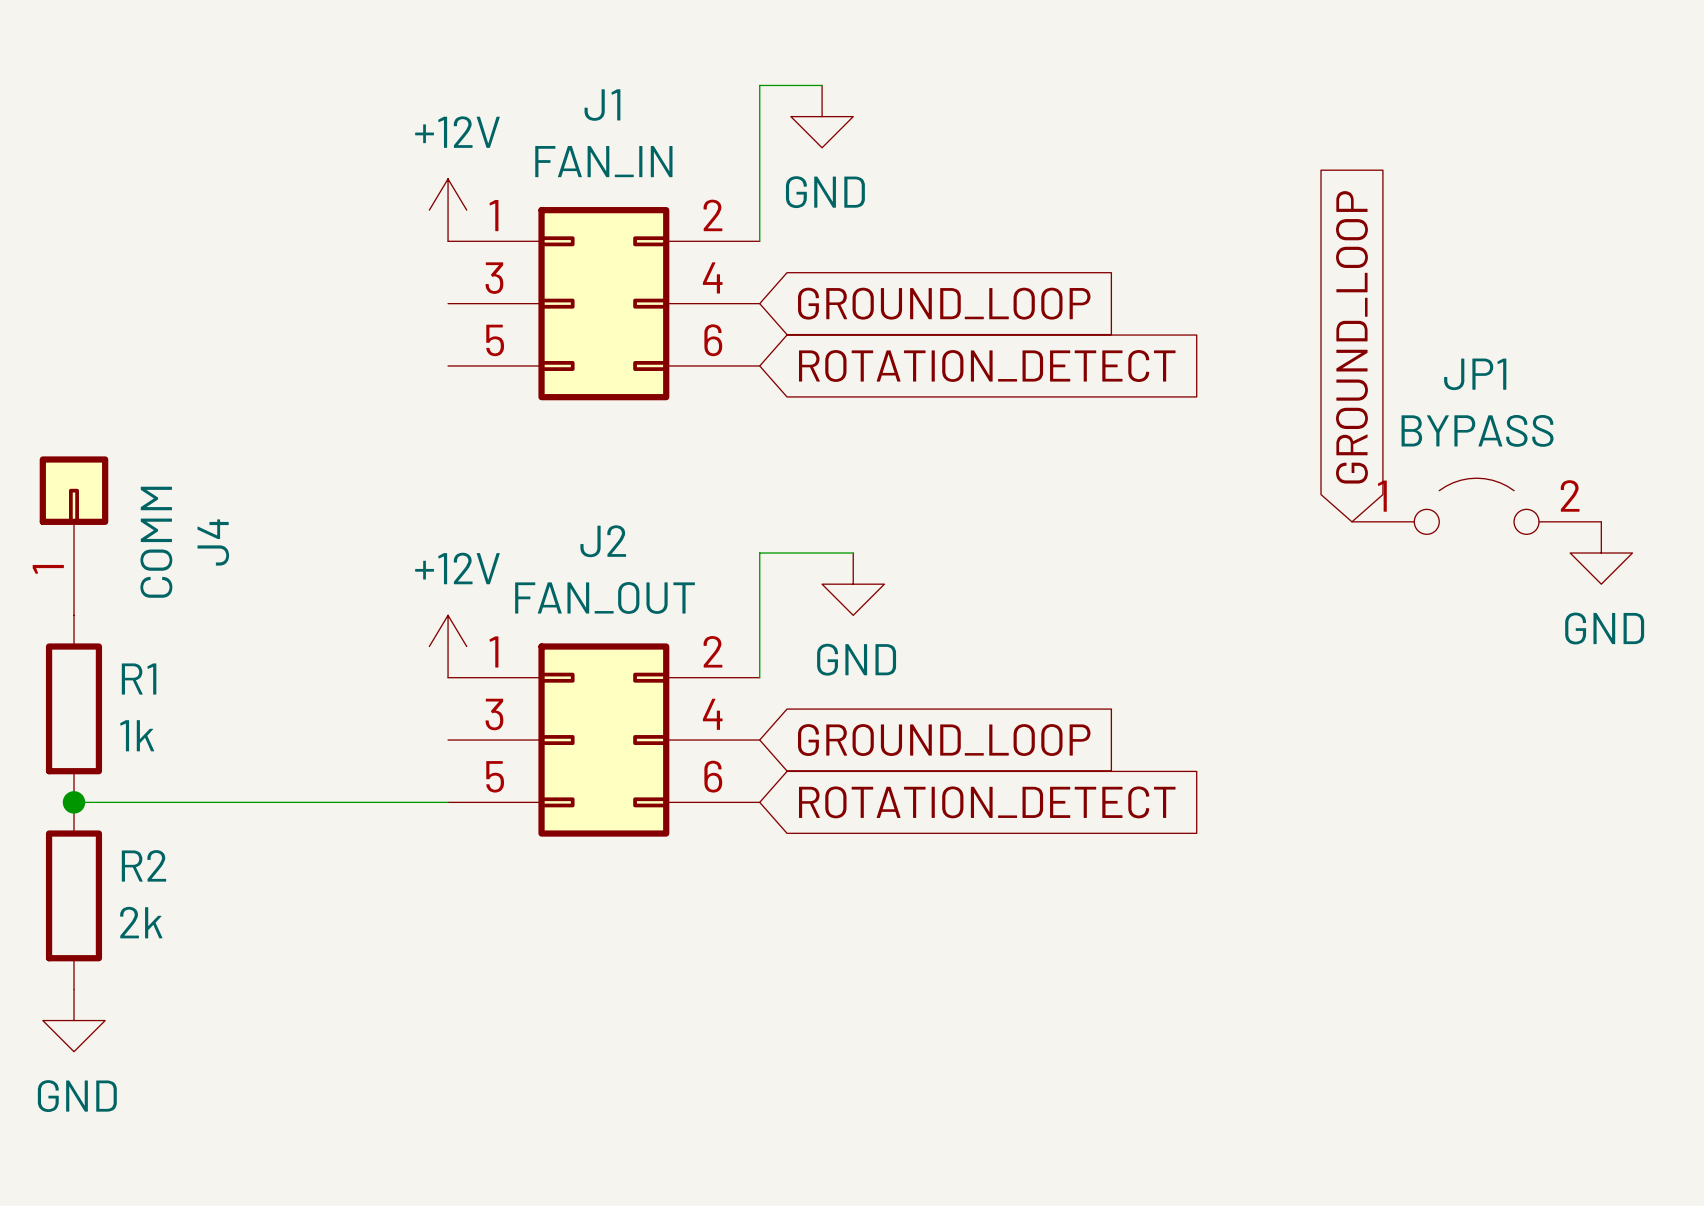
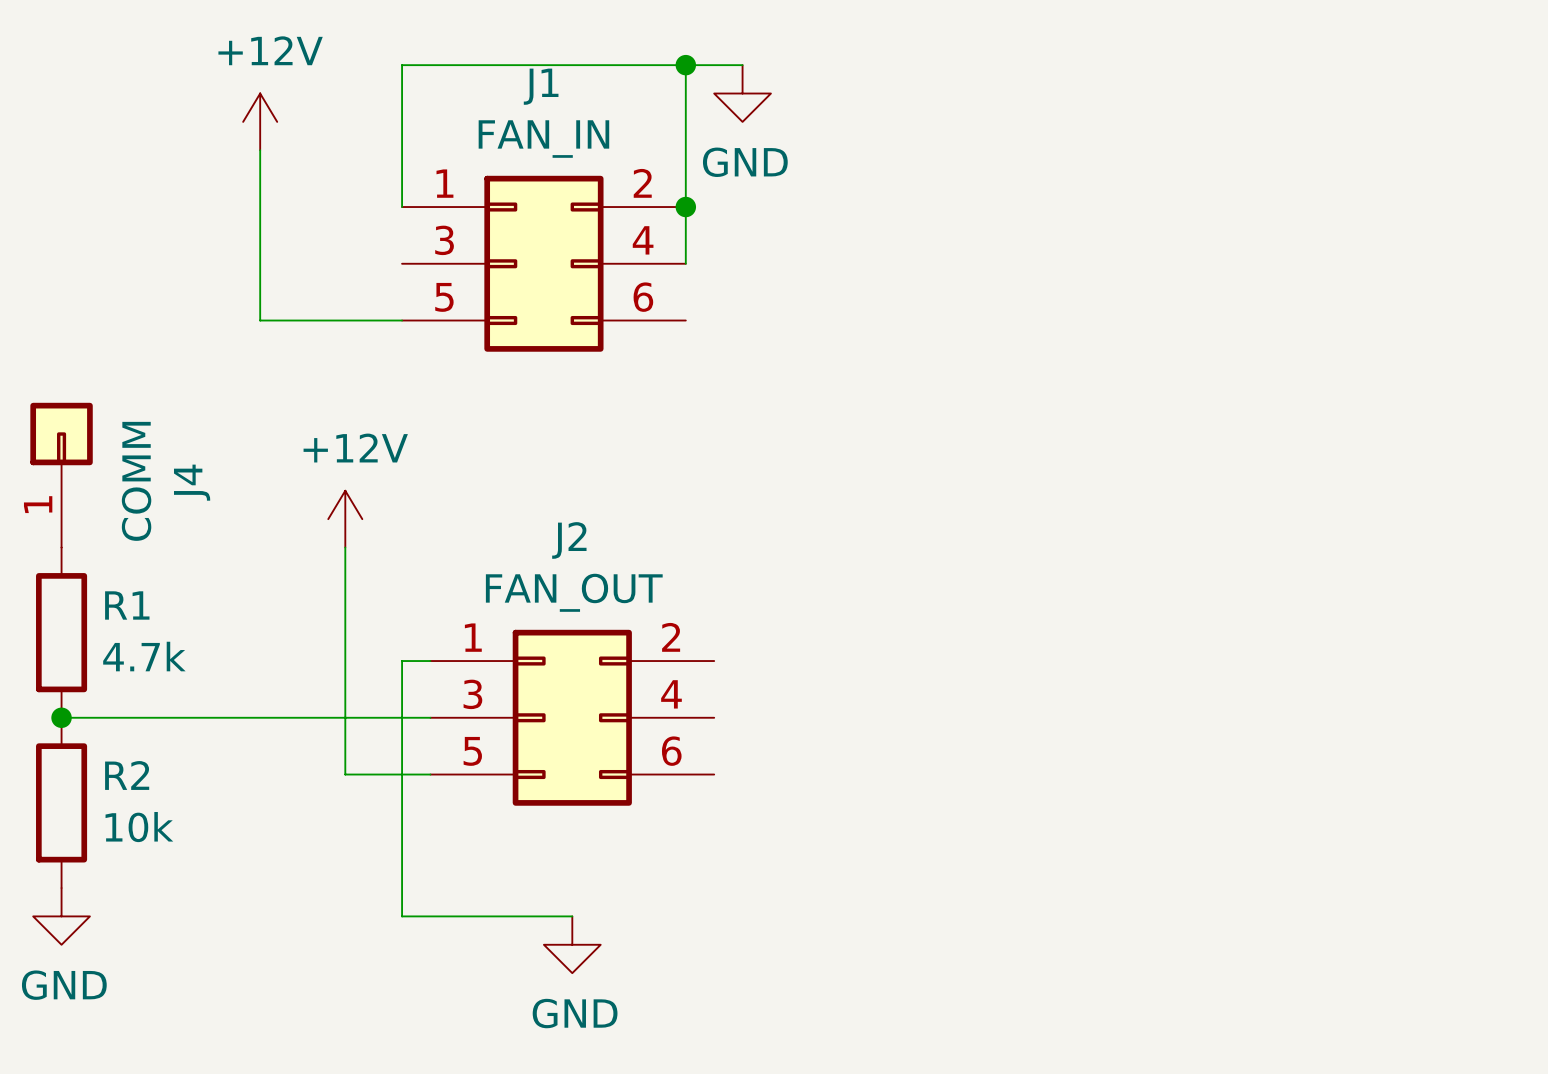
wire: none -> (685, 65) (402, 65) (402, 207)
junction: none -> (685, 65)
wire: none -> (260, 150) (260, 320) (402, 320)
power symbol position: +12V (448, 210) -> +12V (260, 121)
wire: none -> (685, 207) (685, 263)
junction: none -> (685, 207)
global label: GROUND_LOOP (944, 303) -> none
global label: GROUND_LOOP (1351, 337) -> none
global label: ROTATION_DETECT (987, 366) -> none
JP1: BYPASS (1476, 506) -> none
wire: (853, 553) (759, 553) (759, 677) -> none
power symbol: GND (1601, 553) -> none
power symbol position: GND (853, 584) -> GND (572, 944)
wire: none -> (345, 547) (345, 774) (430, 774)
power symbol position: +12V (448, 646) -> +12V (345, 519)
R1 value: 1k (137, 735) -> 4.7k (144, 656)
wire: none -> (430, 661) (402, 661) (402, 916) (572, 916)
J2 position: (603, 740) -> (572, 717)
global label: GROUND_LOOP (944, 740) -> none
global label: ROTATION_DETECT (987, 802) -> none
R2 value: 2k (141, 922) -> 10k (139, 827)

